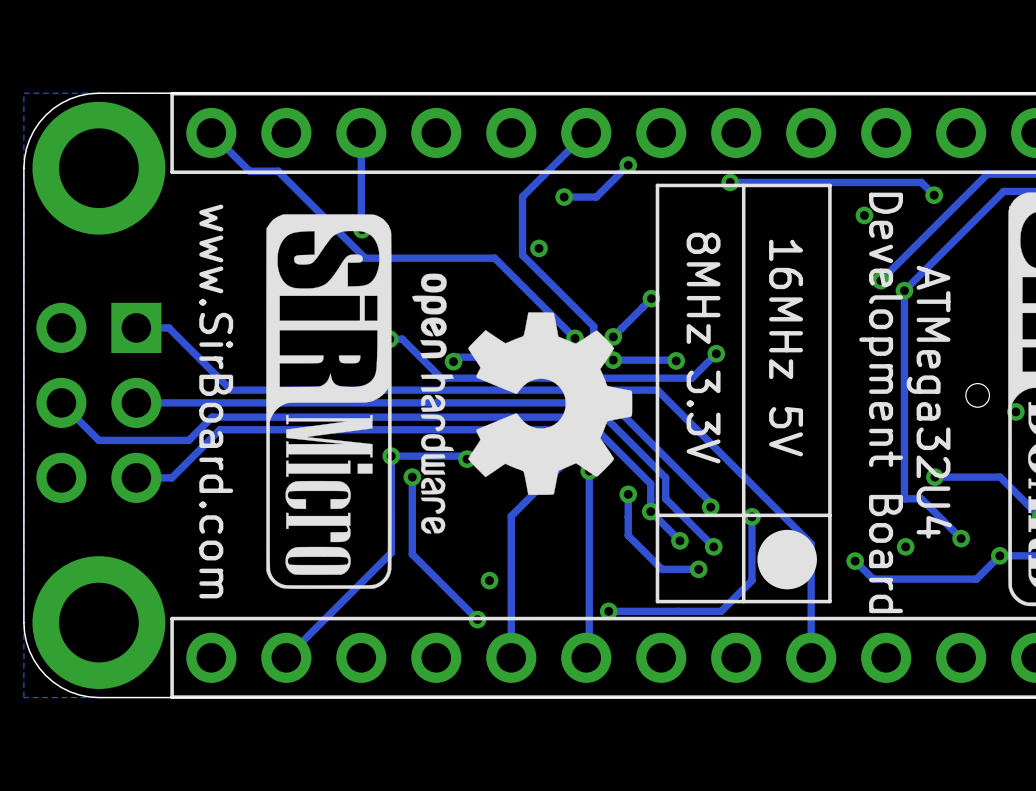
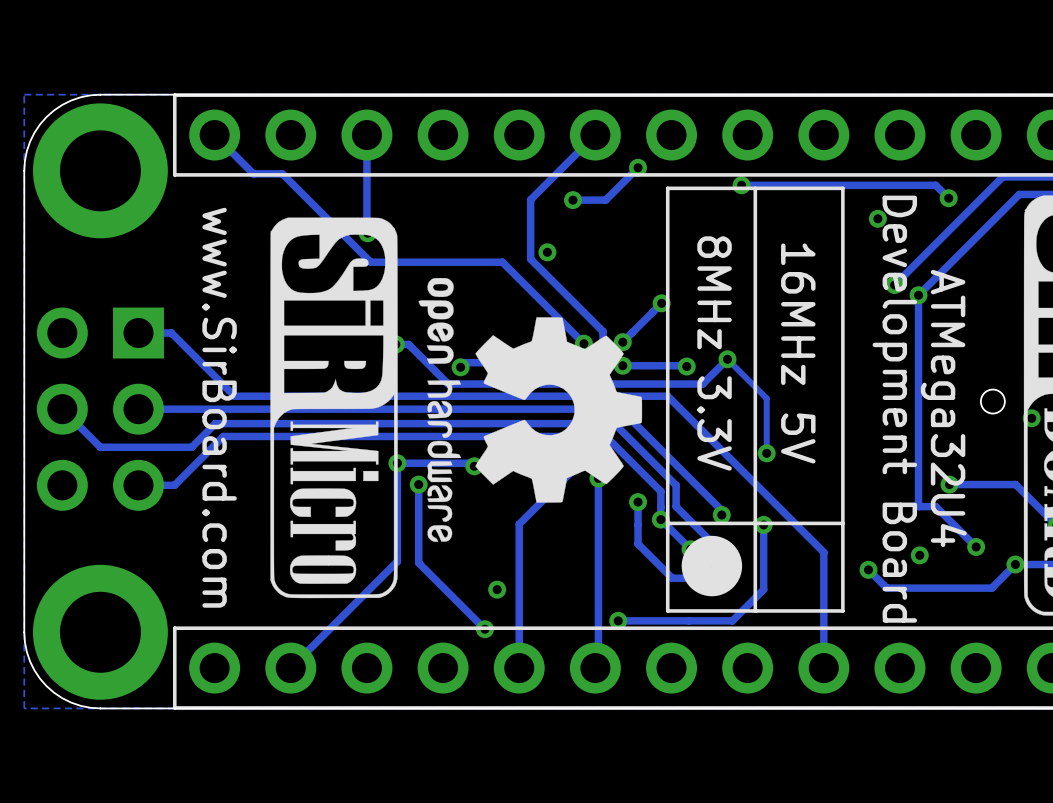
track: none -> (727, 359) (766, 398) (766, 453)
via: none -> (766, 453)
drawing position: (787, 559) -> (711, 566)

